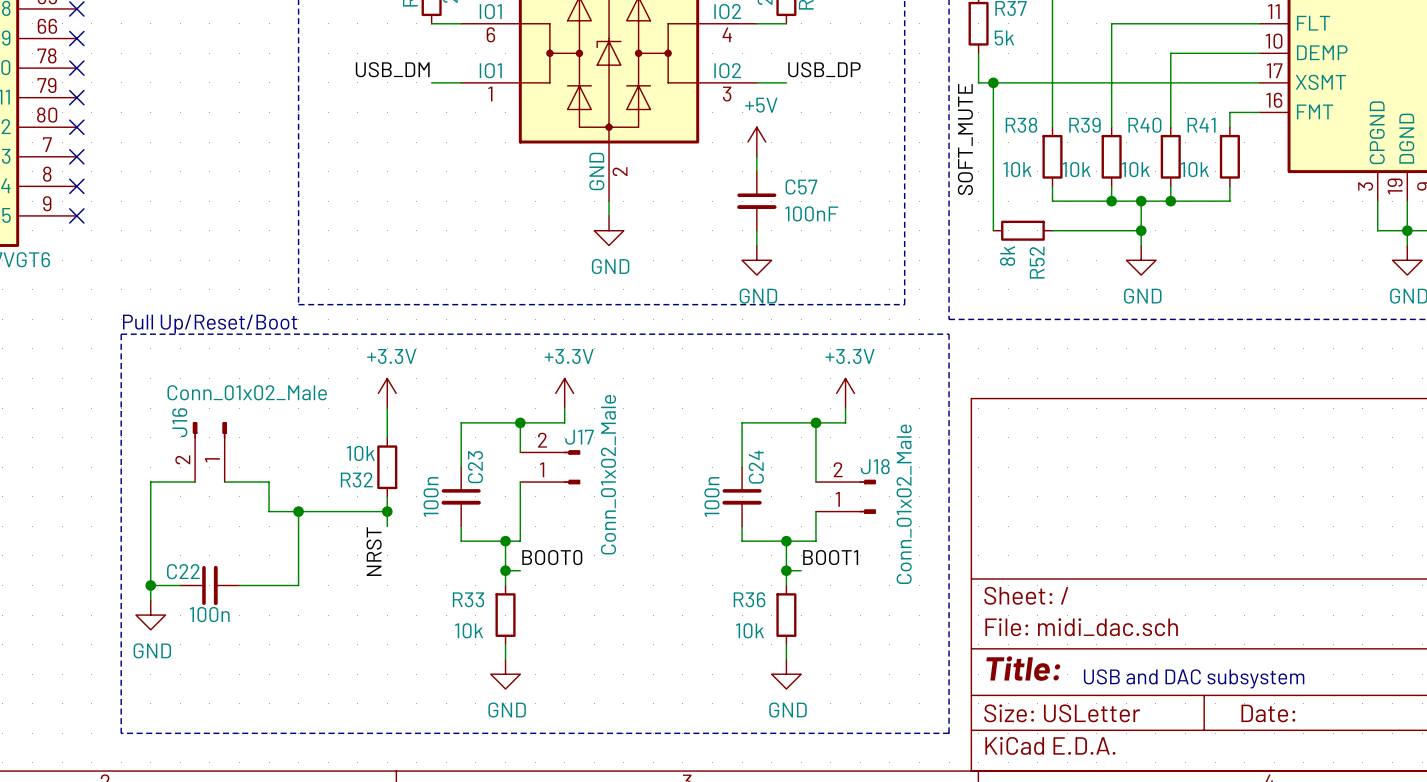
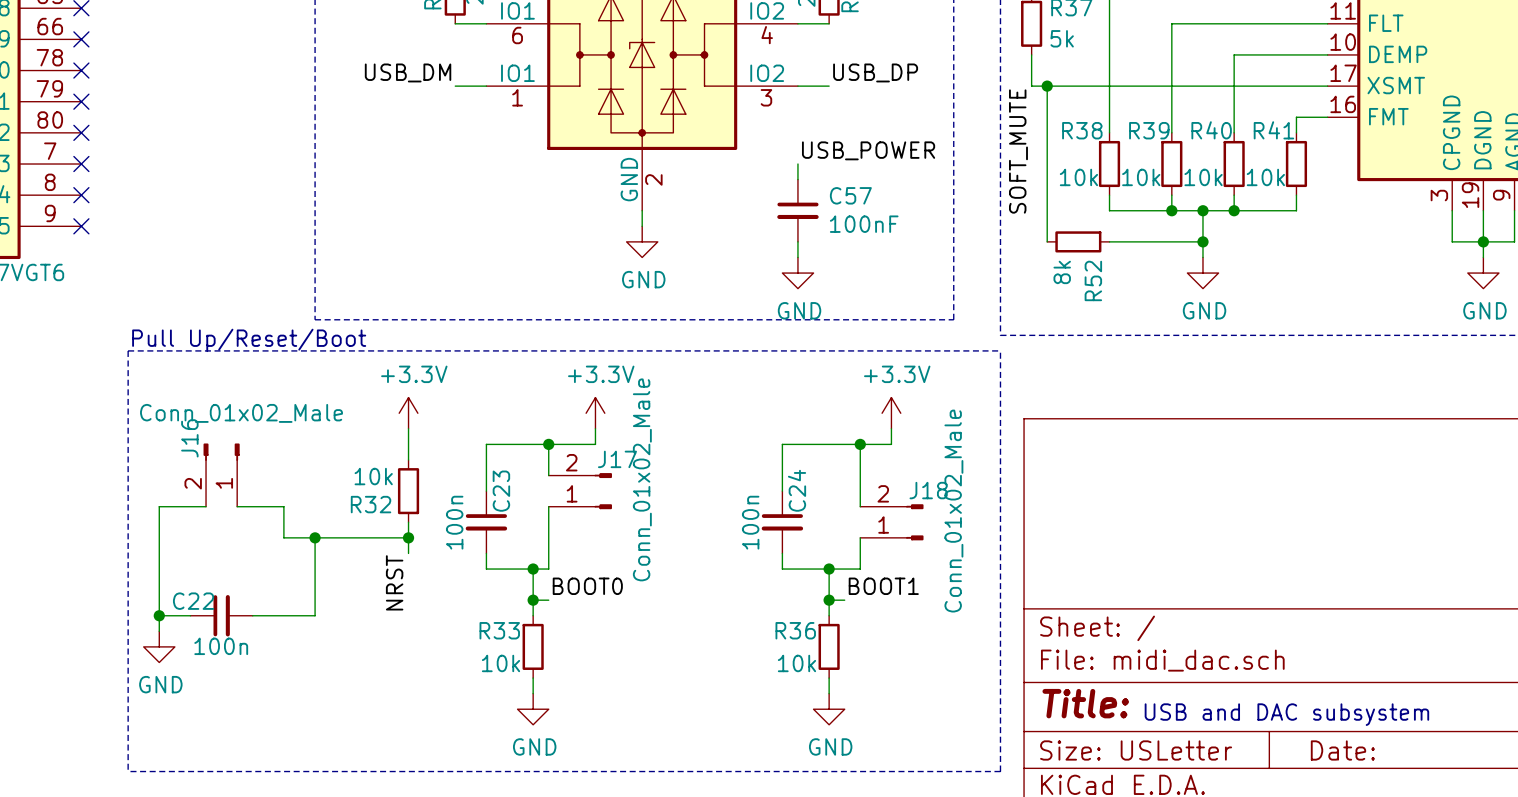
power symbol: +5V (756, 142) -> none
label: none -> USB_POWER (868, 150)

